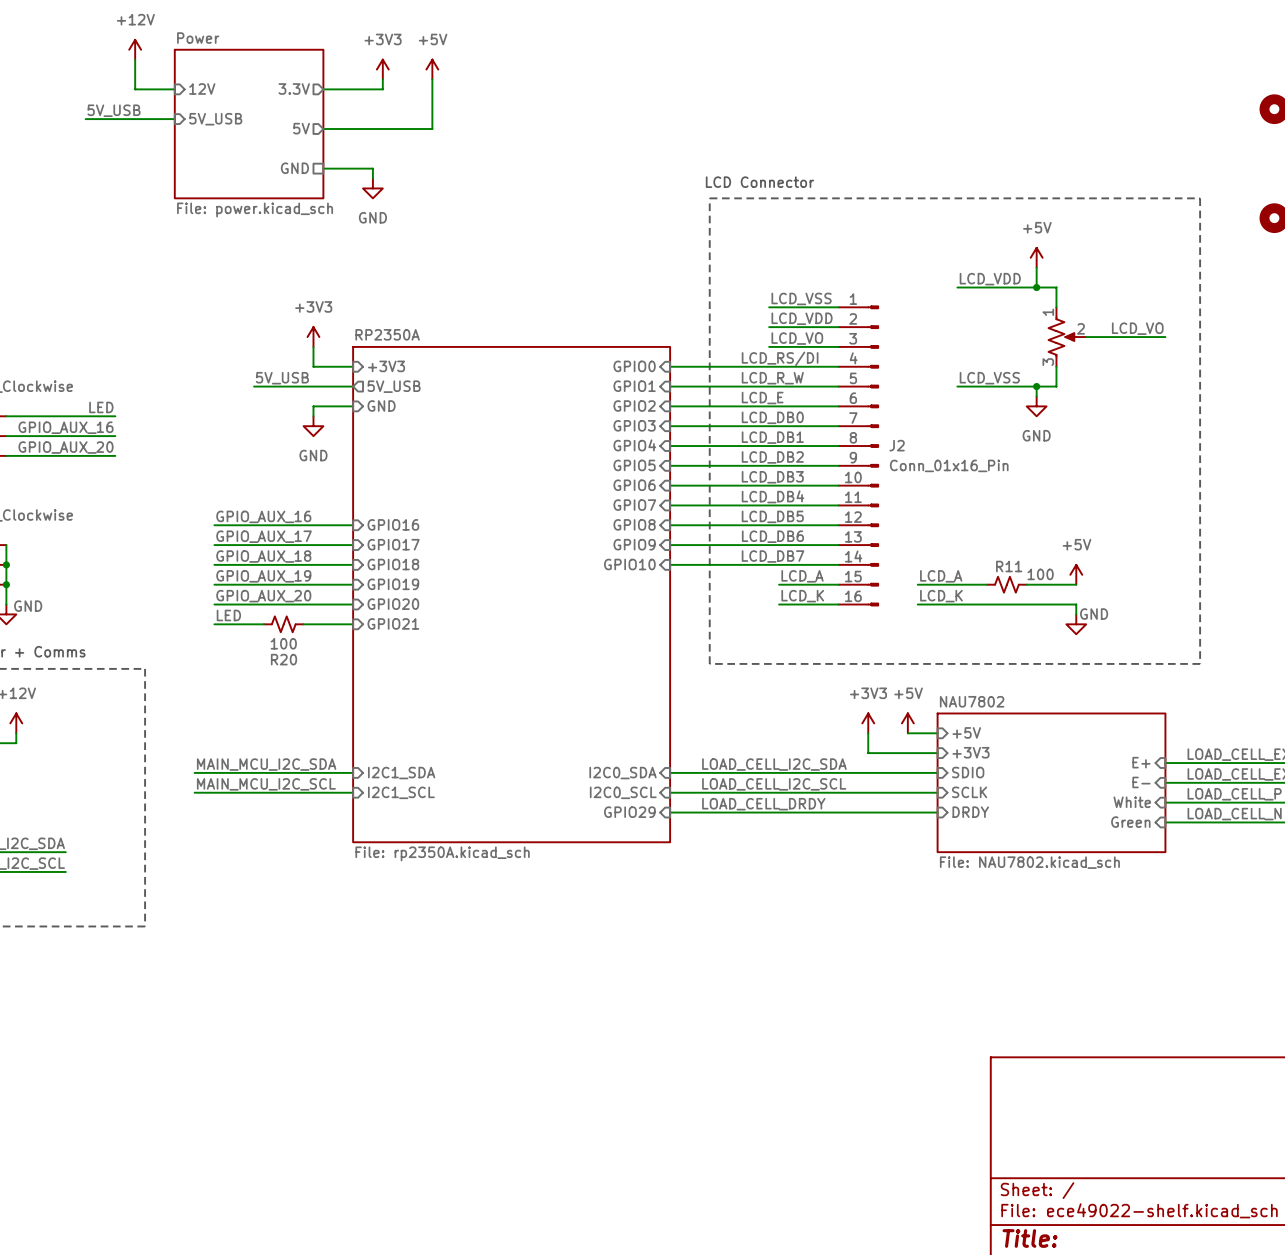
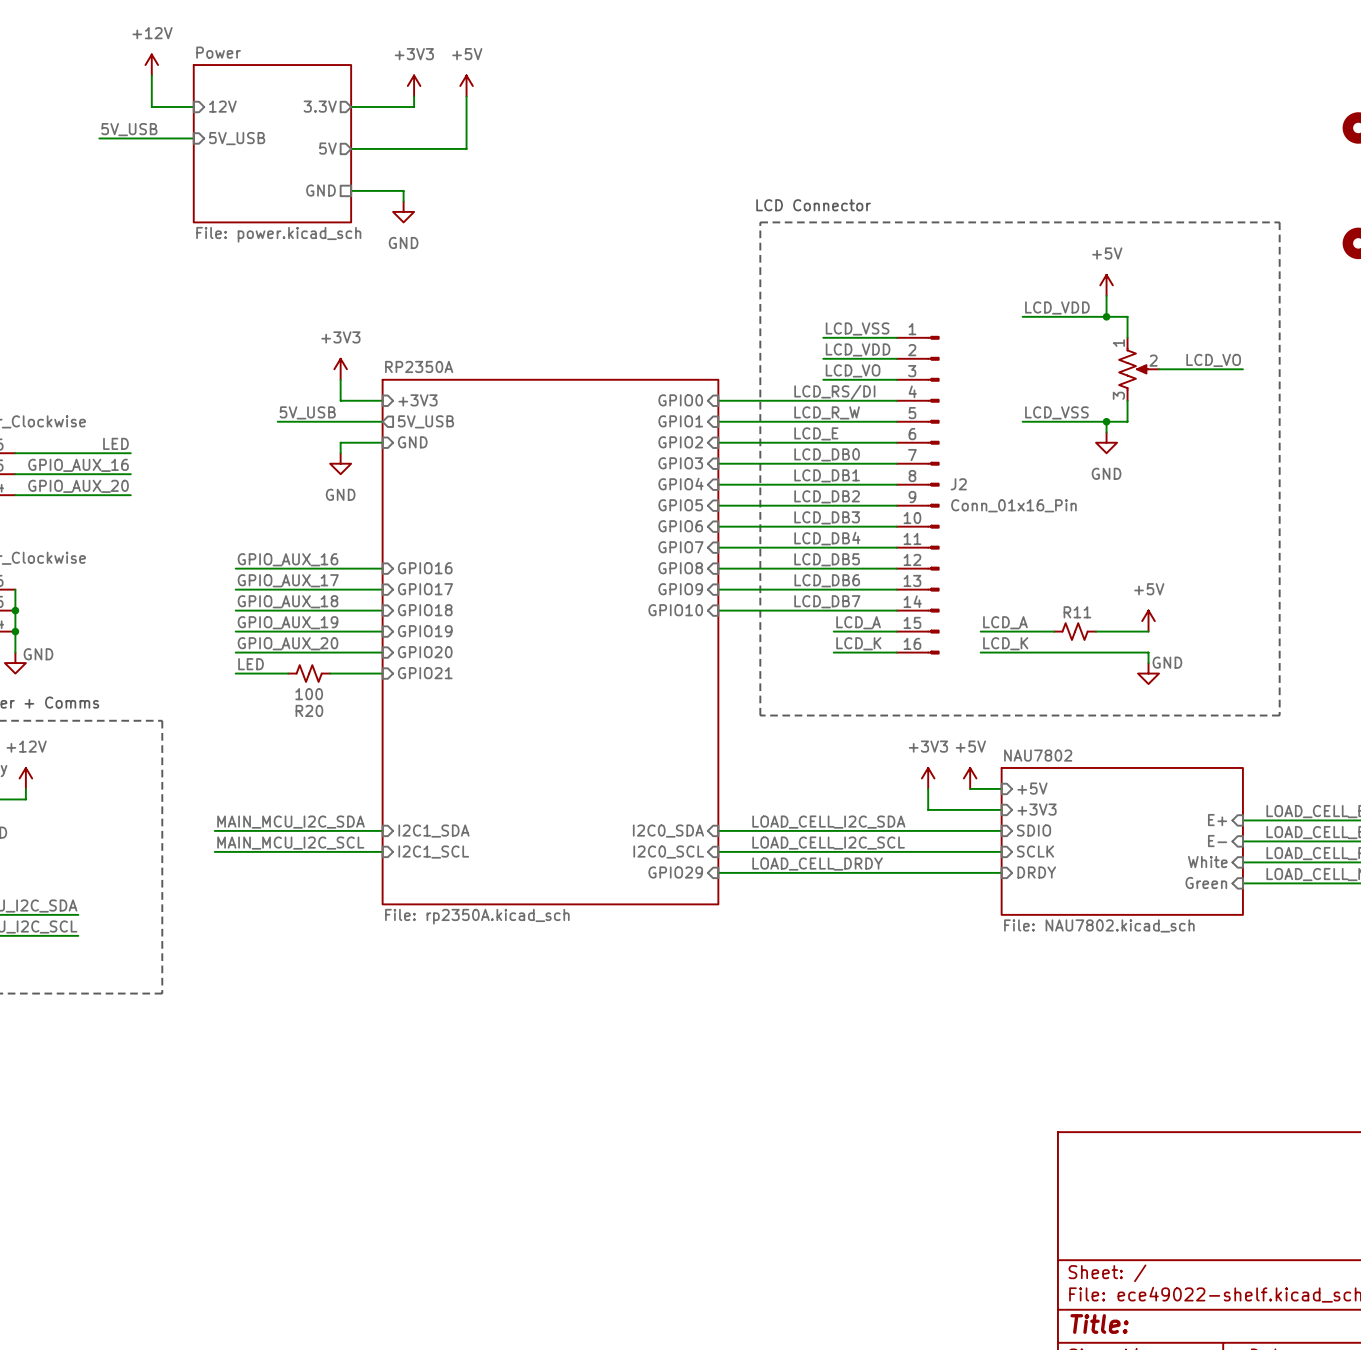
R11 value: 100 (1040, 574) -> none

